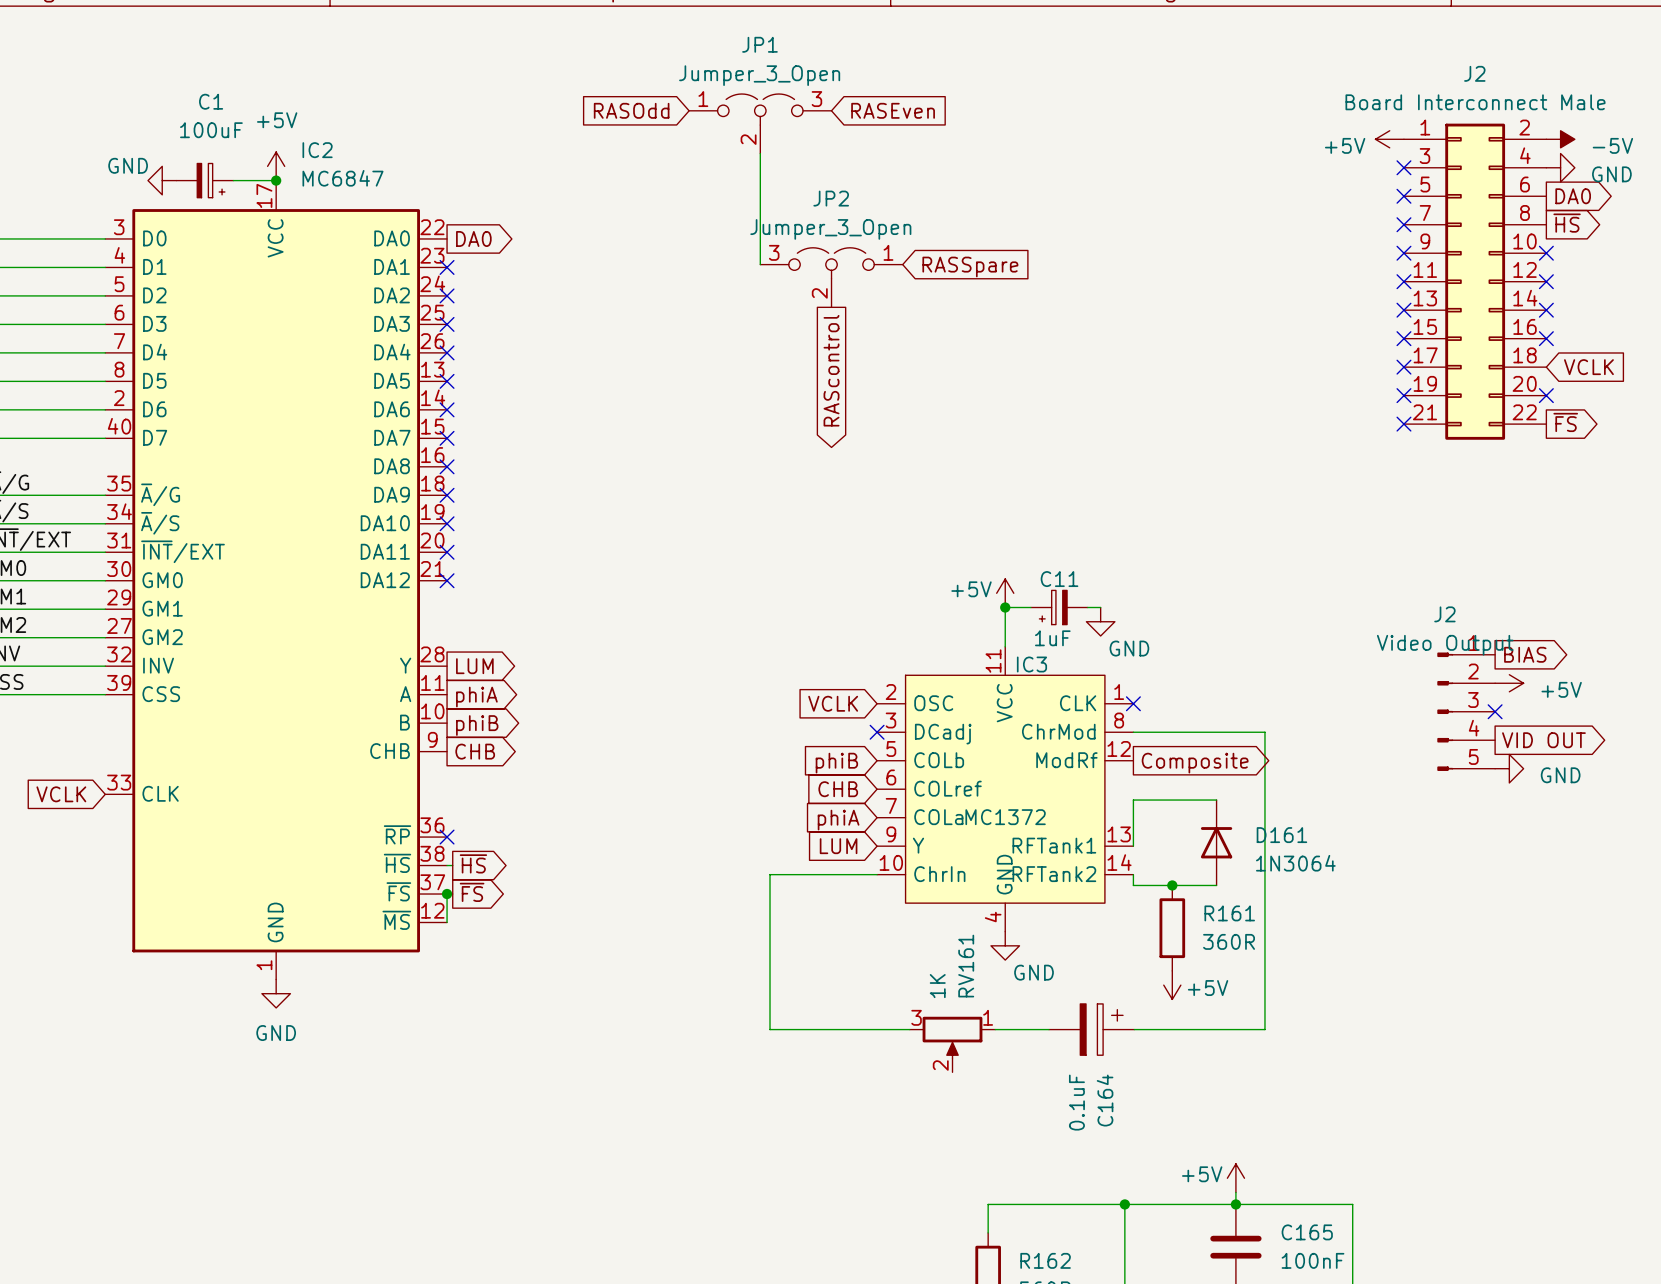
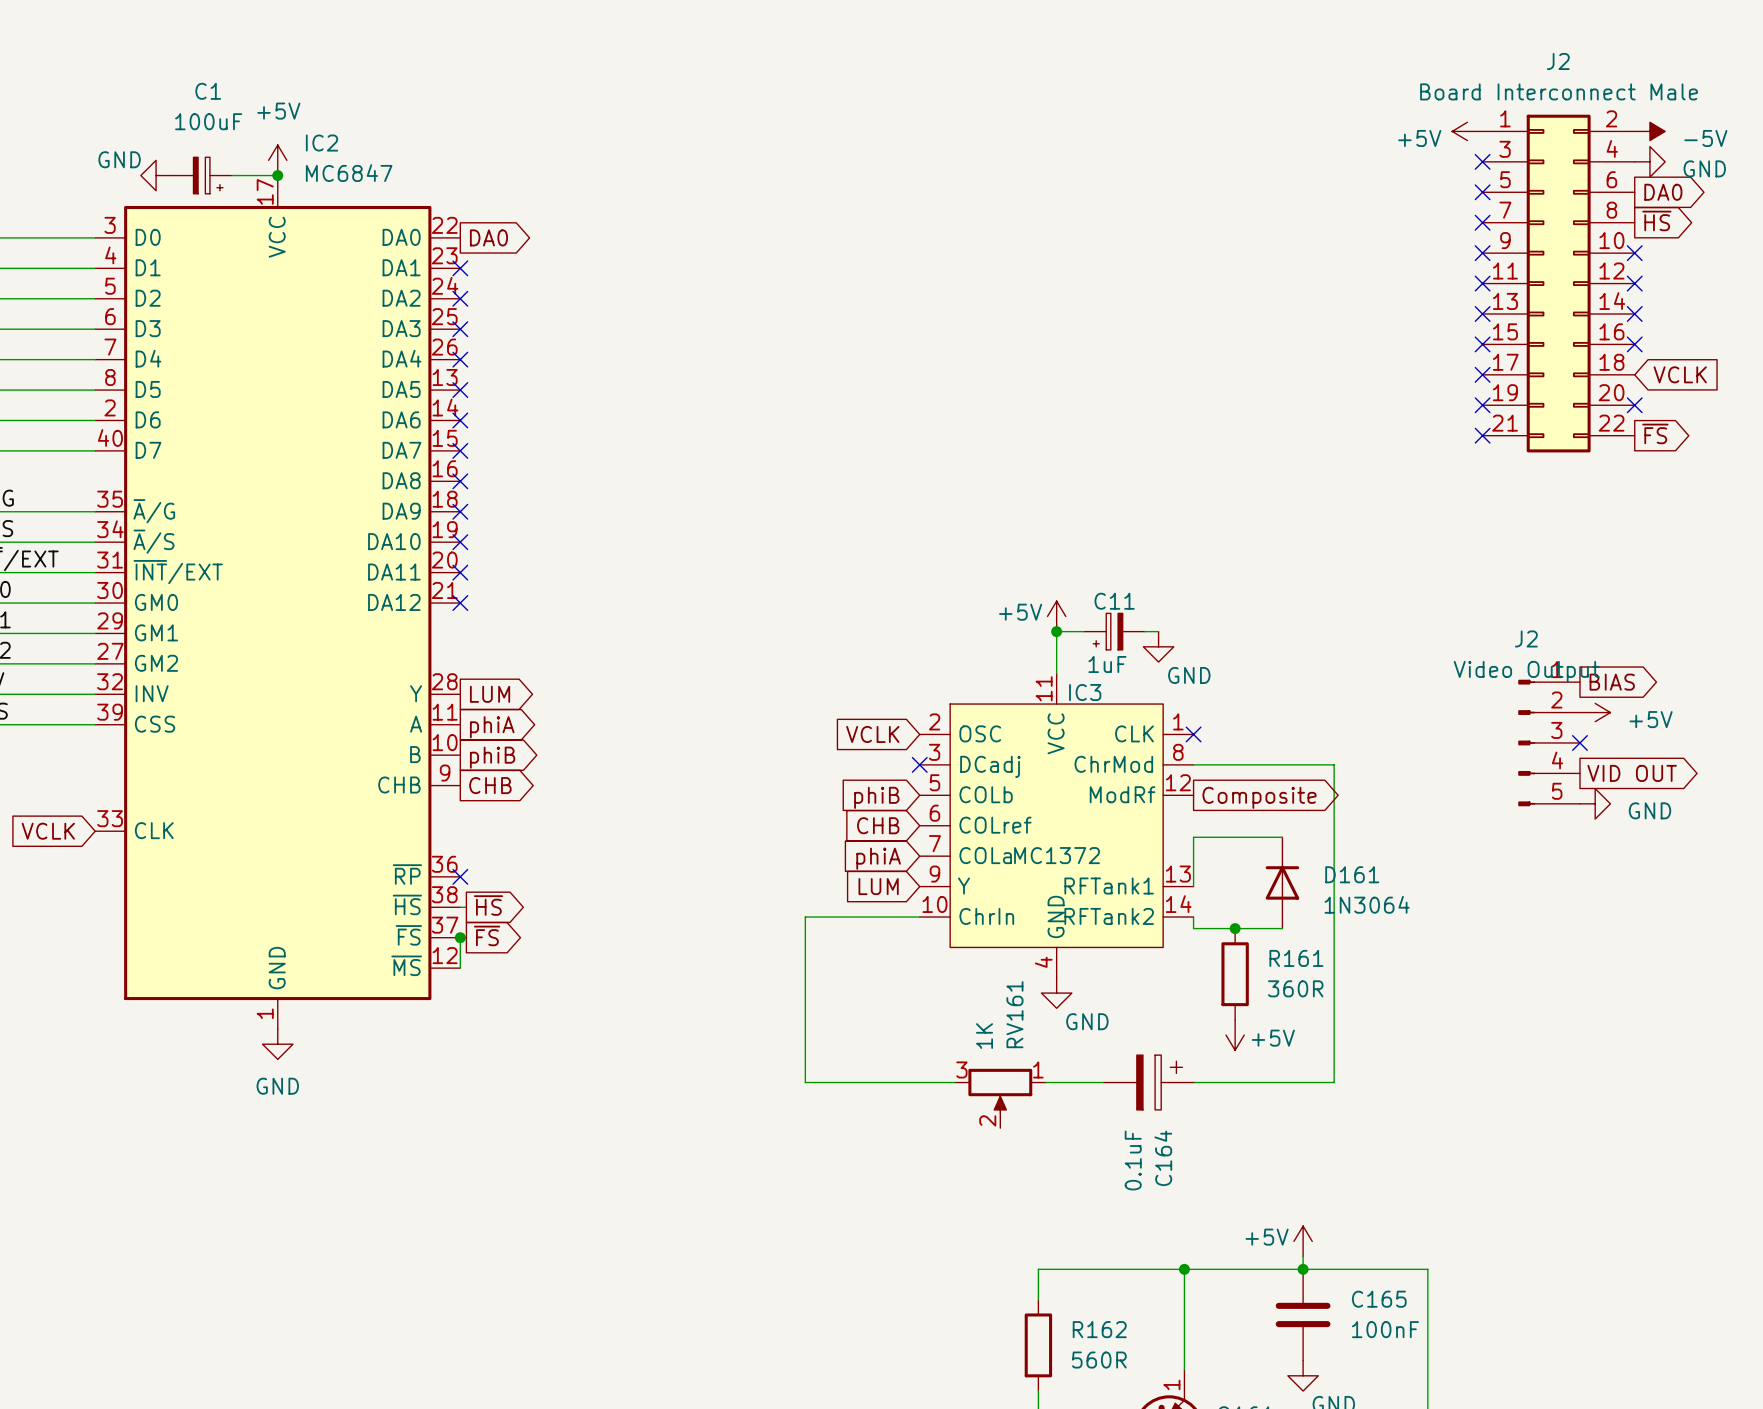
global label: RASOdd (631, 110) -> none
global label: RASEven (893, 110) -> none
JP1: Jumper_3_Open (760, 123) -> none
wire: (760, 153) (760, 264) -> none
global label: RASSpare (970, 266) -> none
JP2: Jumper_3_Open (831, 277) -> none
global label: RAScontrol (831, 370) -> none

